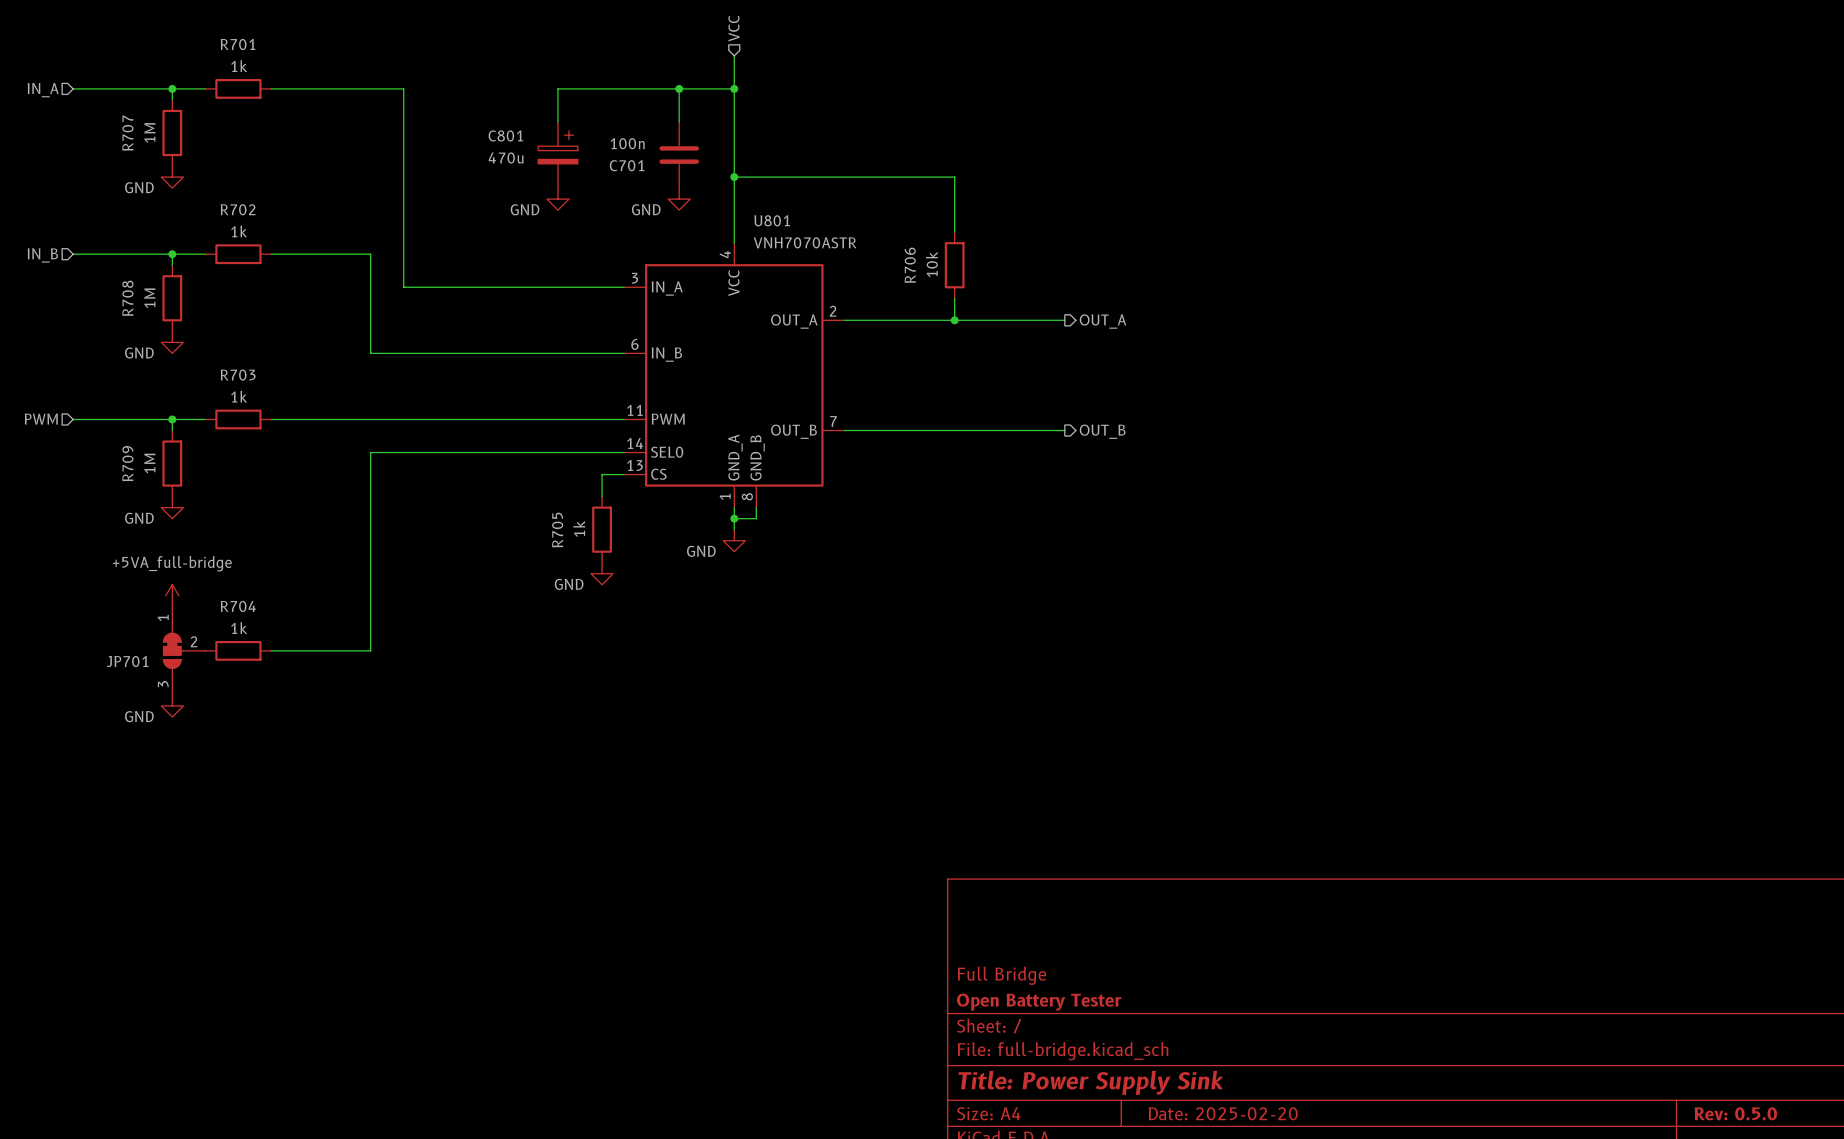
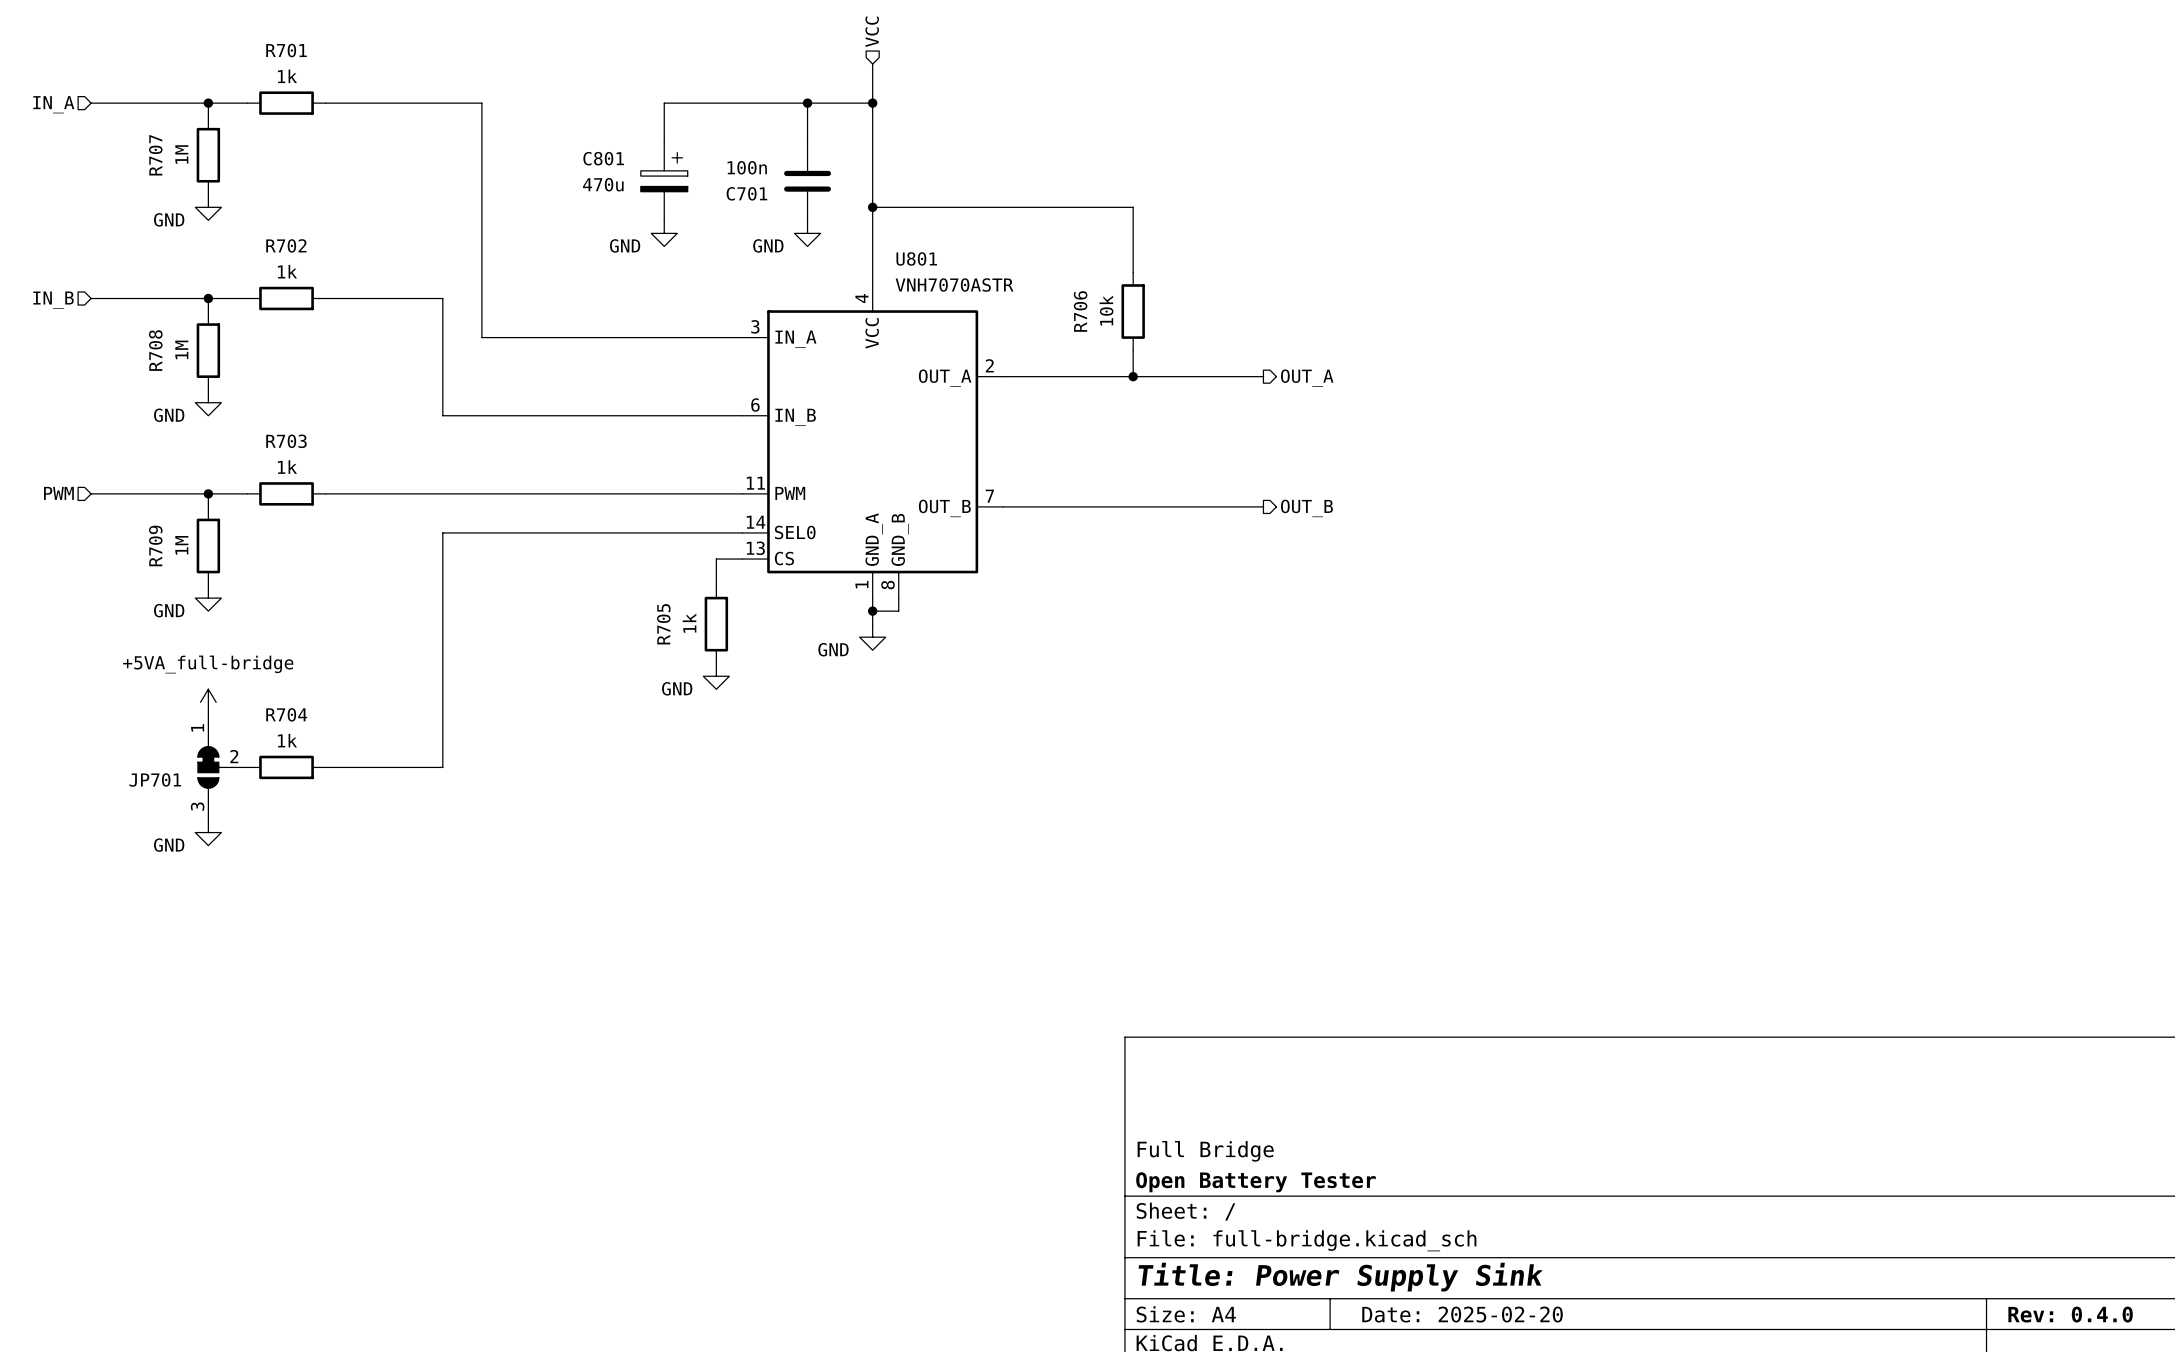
title block: Rev: 0.5.0 (1735, 1113) -> Rev: 0.4.0 (2070, 1314)

